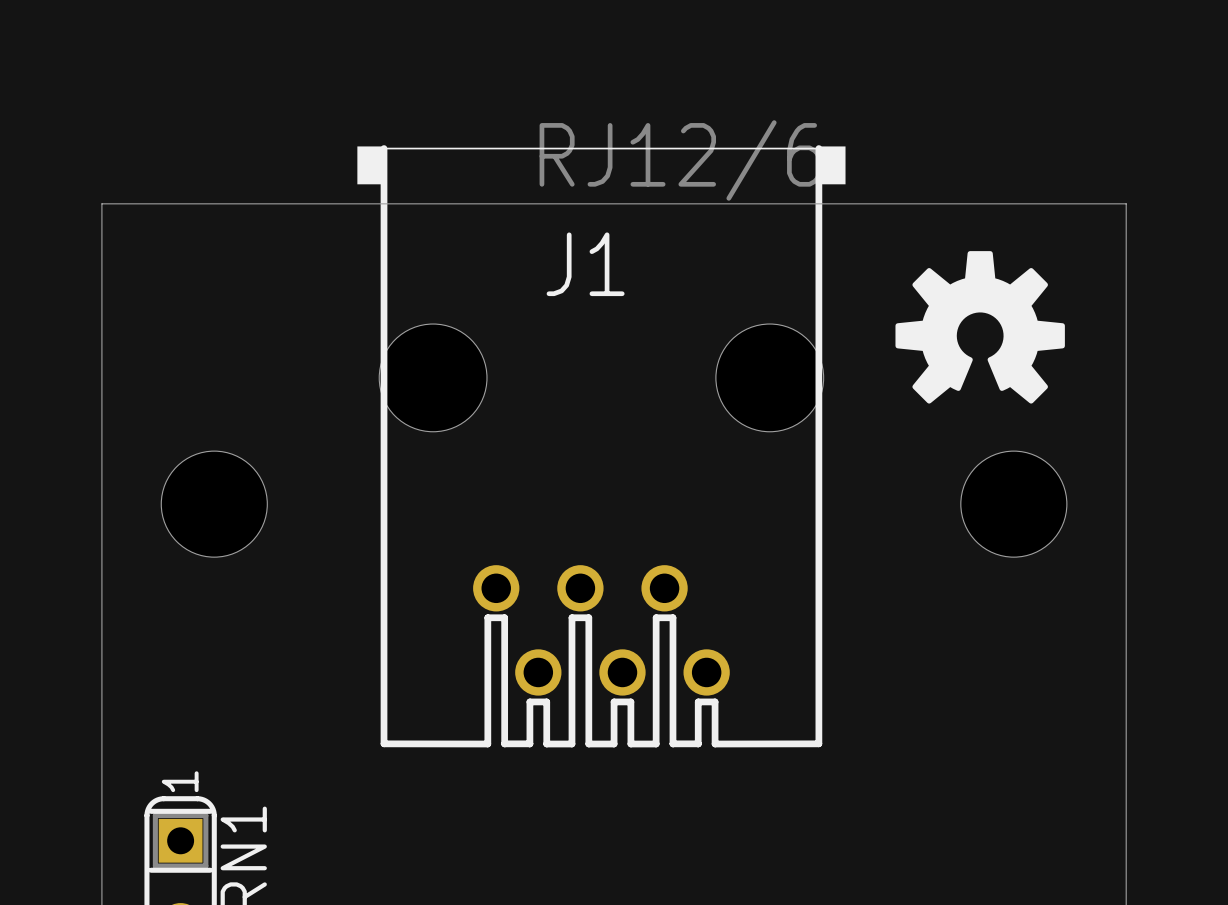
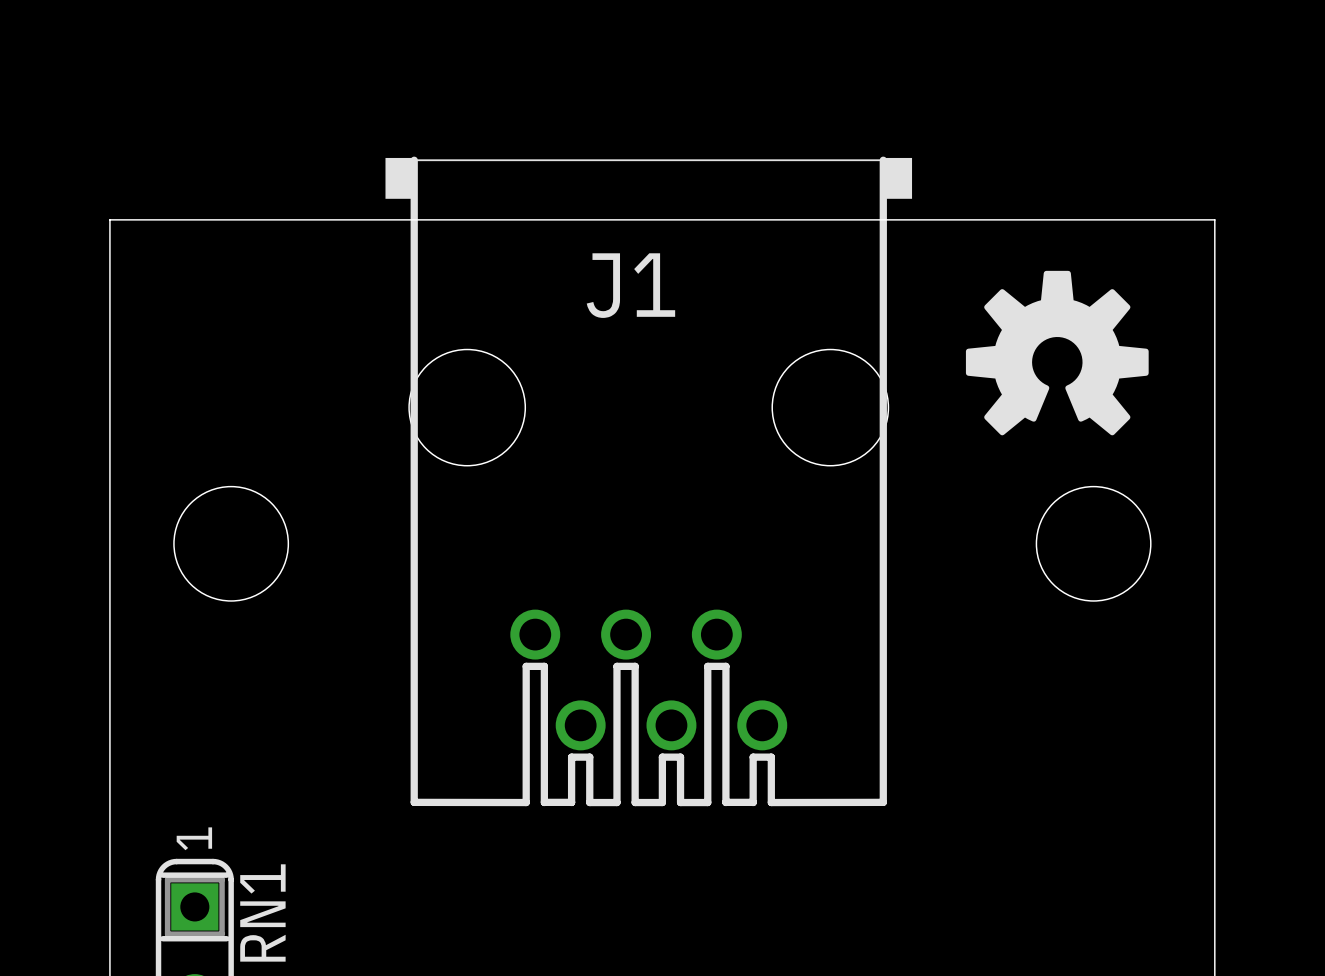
J1 value: RJ12/6 (680, 160) -> none

